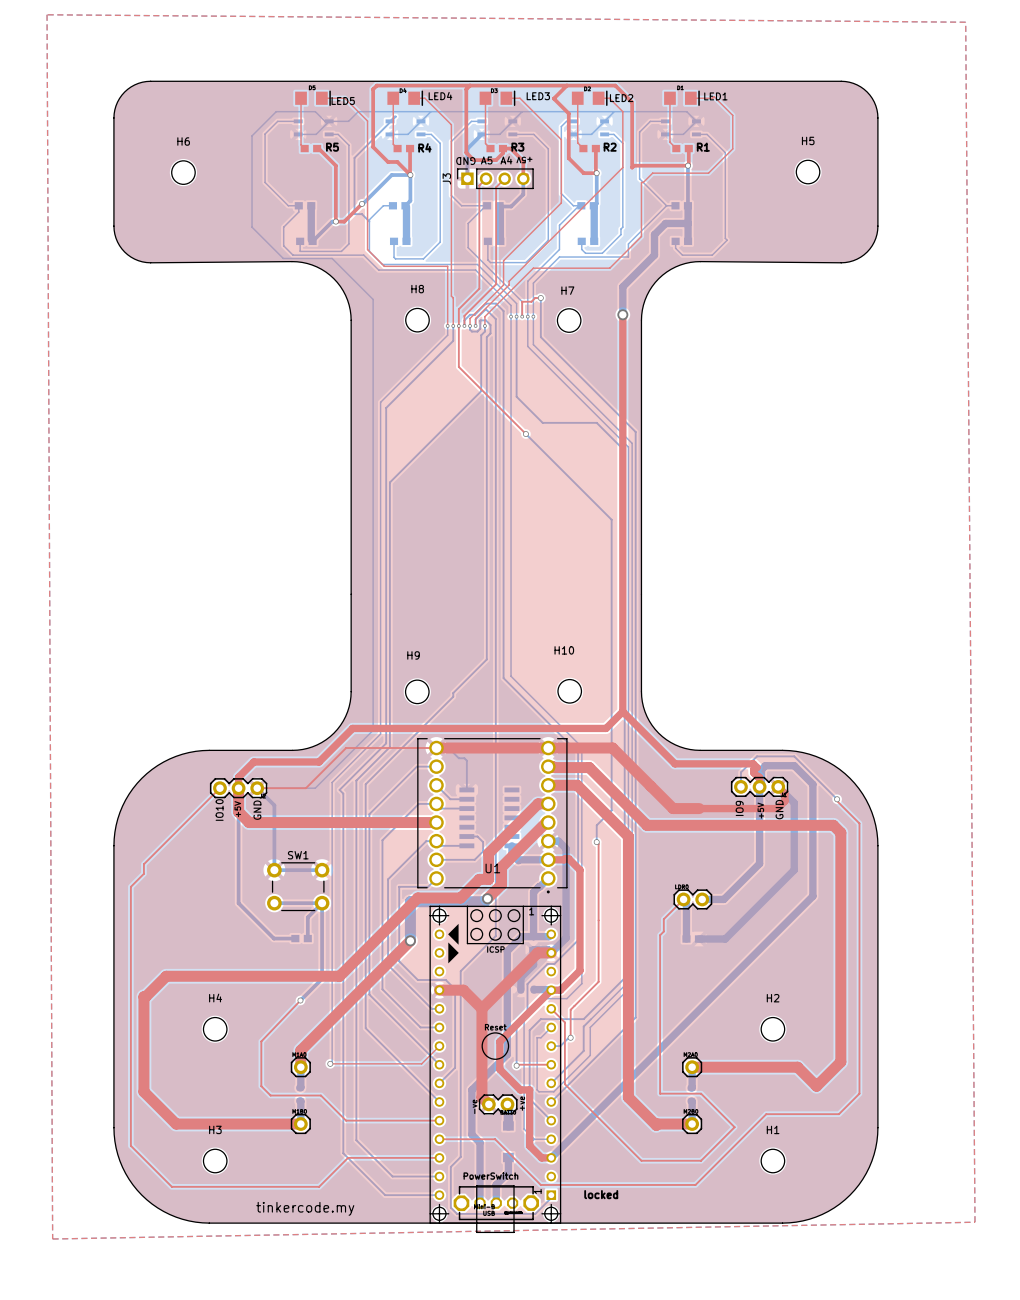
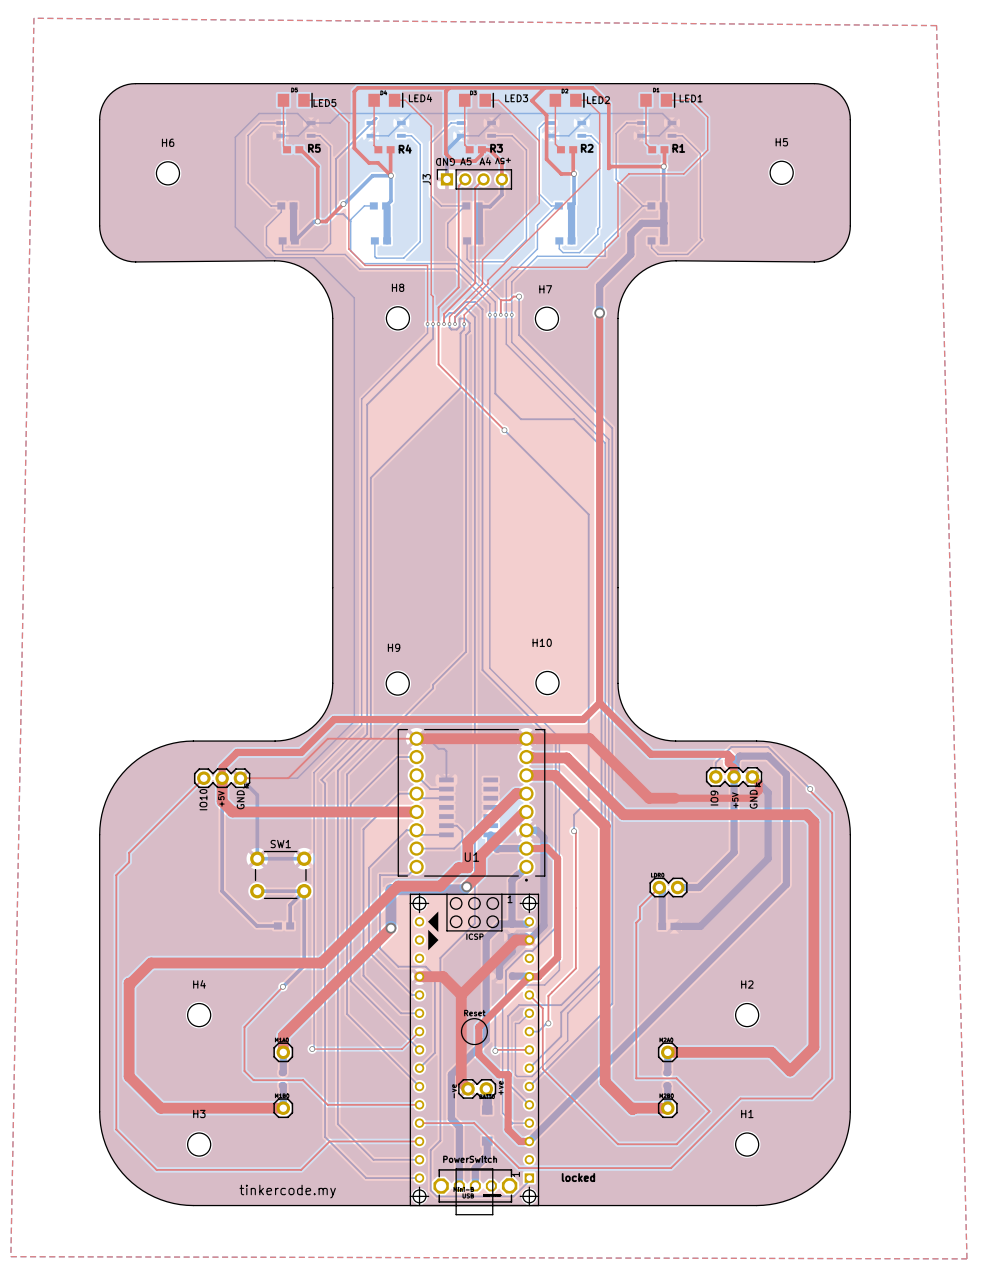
top zone outline: (47, 14) (52, 1239) (975, 1222) (965, 22) -> (33, 18) (10, 1256) (966, 1258) (936, 25)

